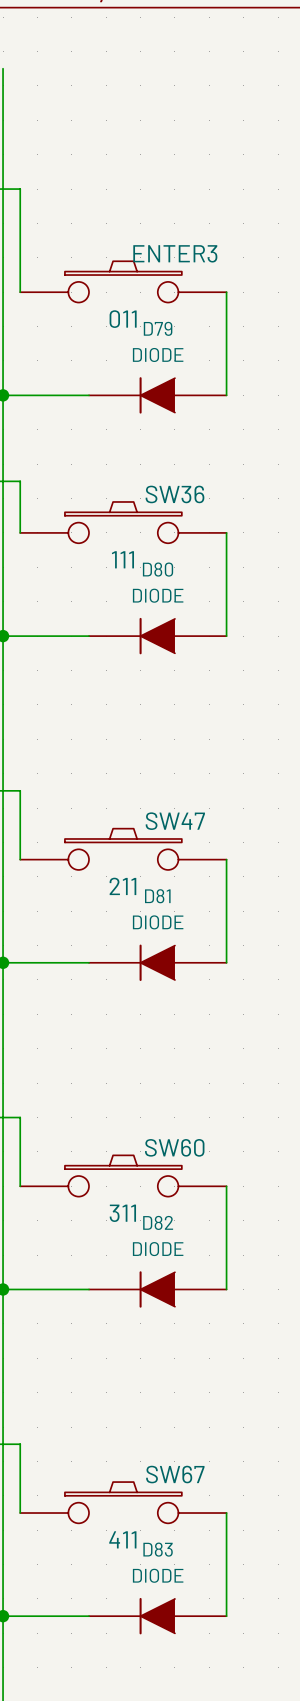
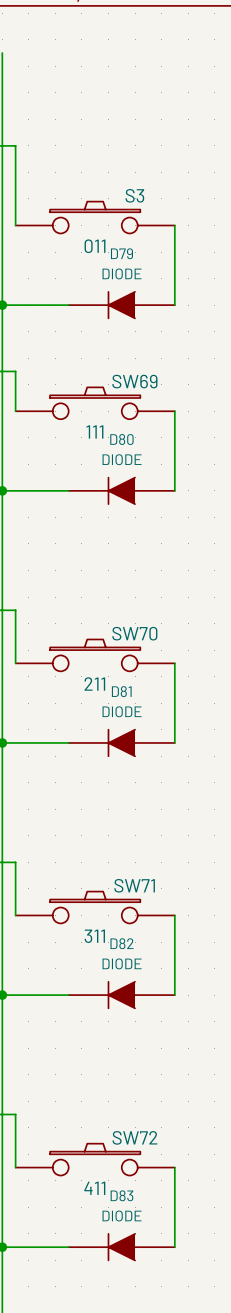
ENTER3 name: ENTER3 (175, 253) -> S3 (134, 195)
SW36 name: SW36 (175, 494) -> SW69 (134, 381)
SW47 name: SW47 (175, 821) -> SW70 (134, 633)
SW60 name: SW60 (174, 1147) -> SW71 (134, 885)
SW67 name: SW67 (175, 1474) -> SW72 (134, 1137)

